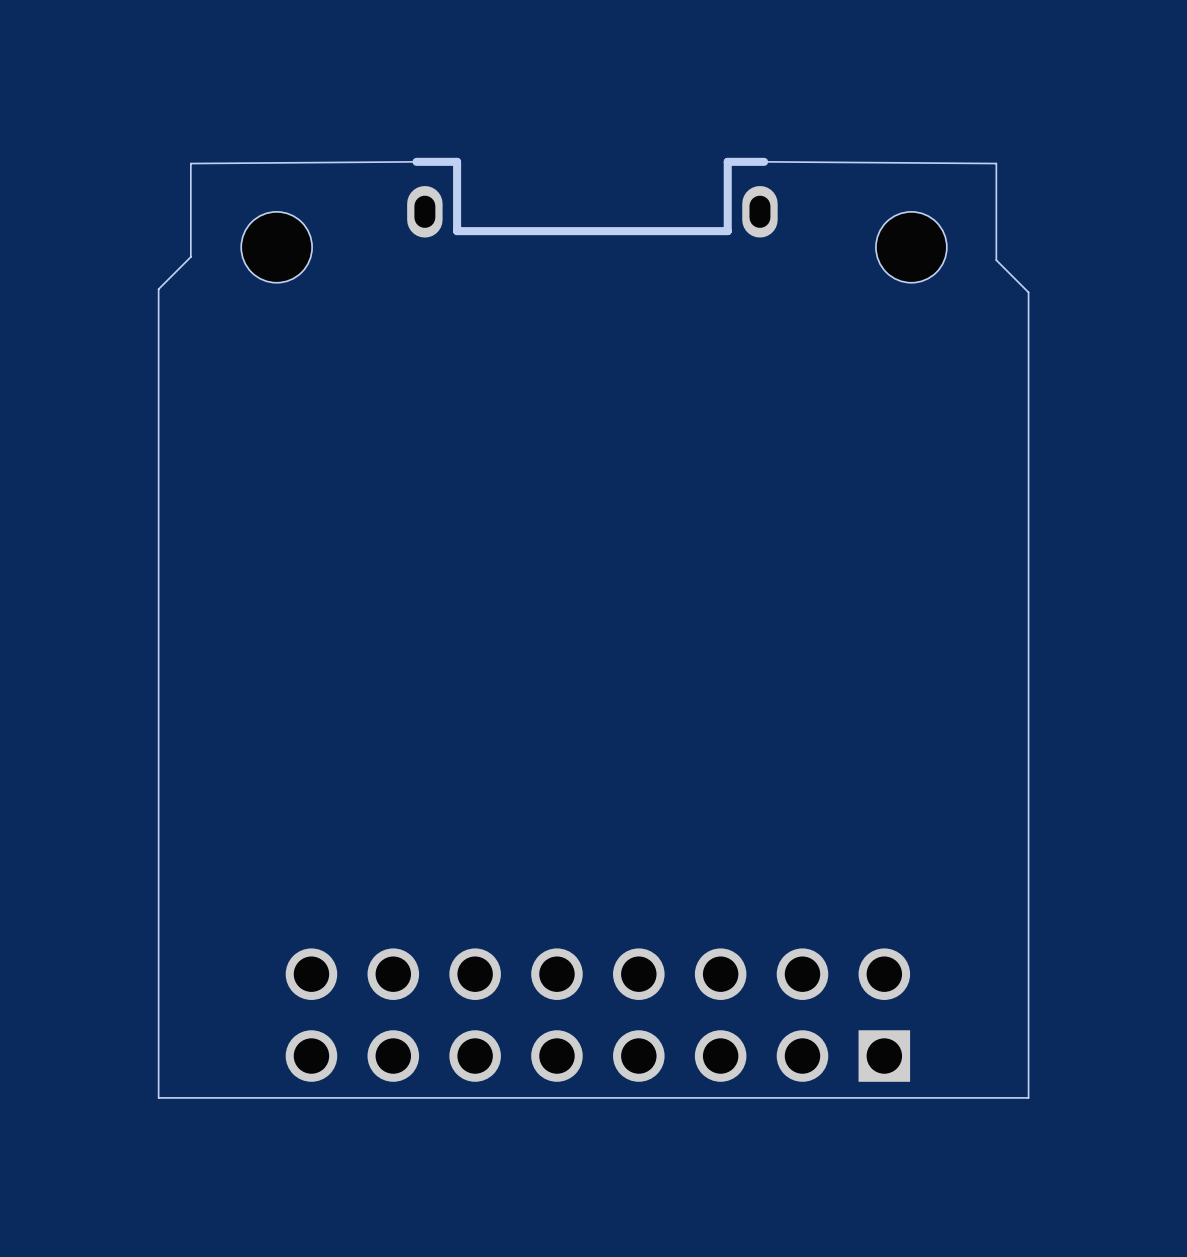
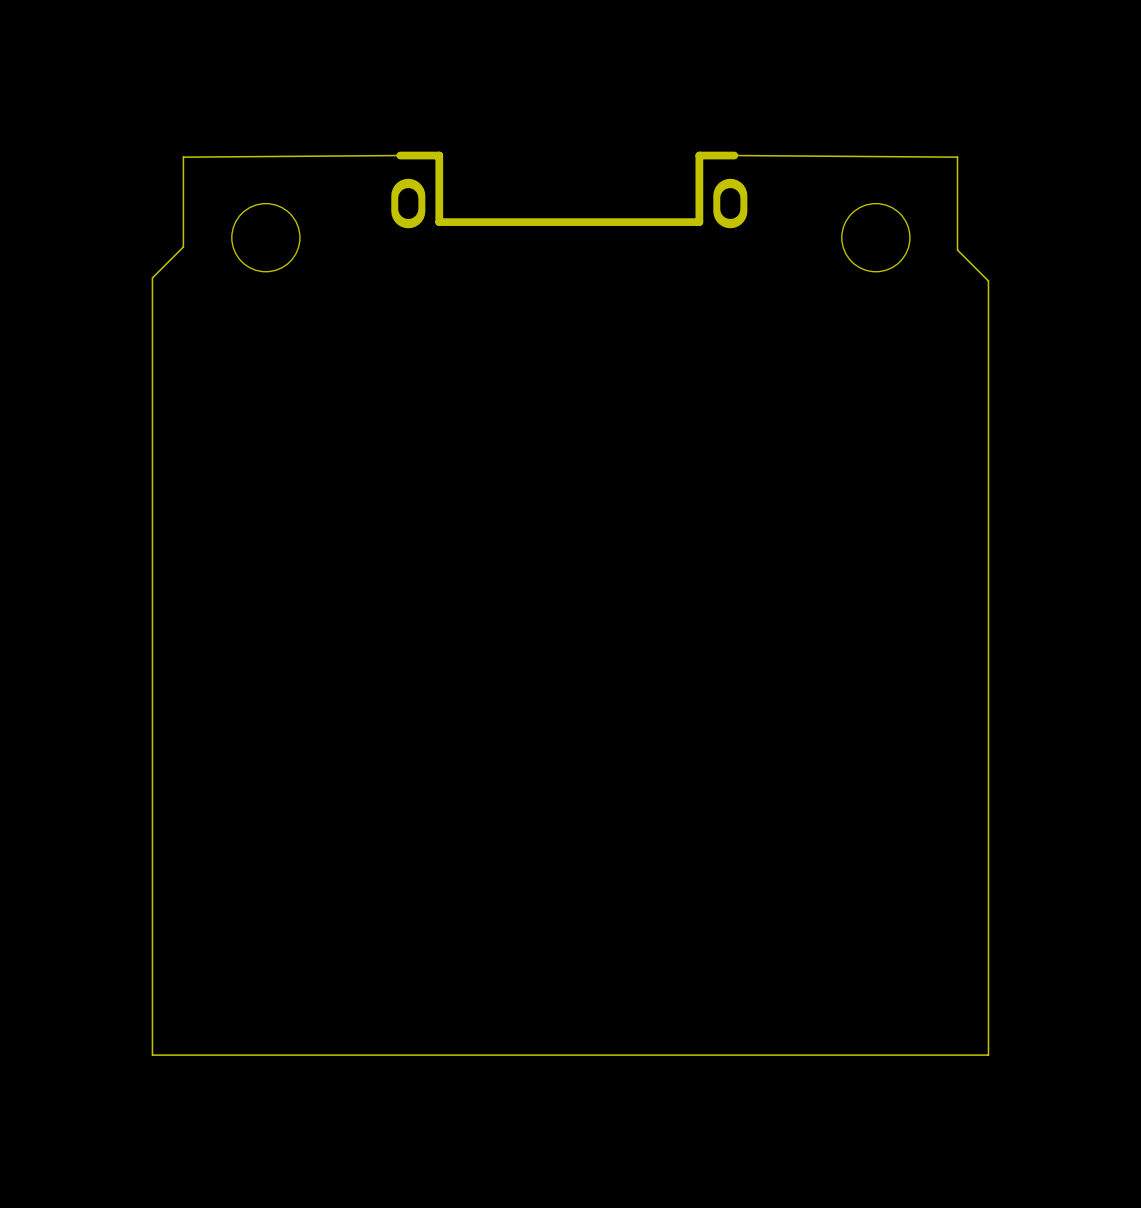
part: (597, 1015) -> none

